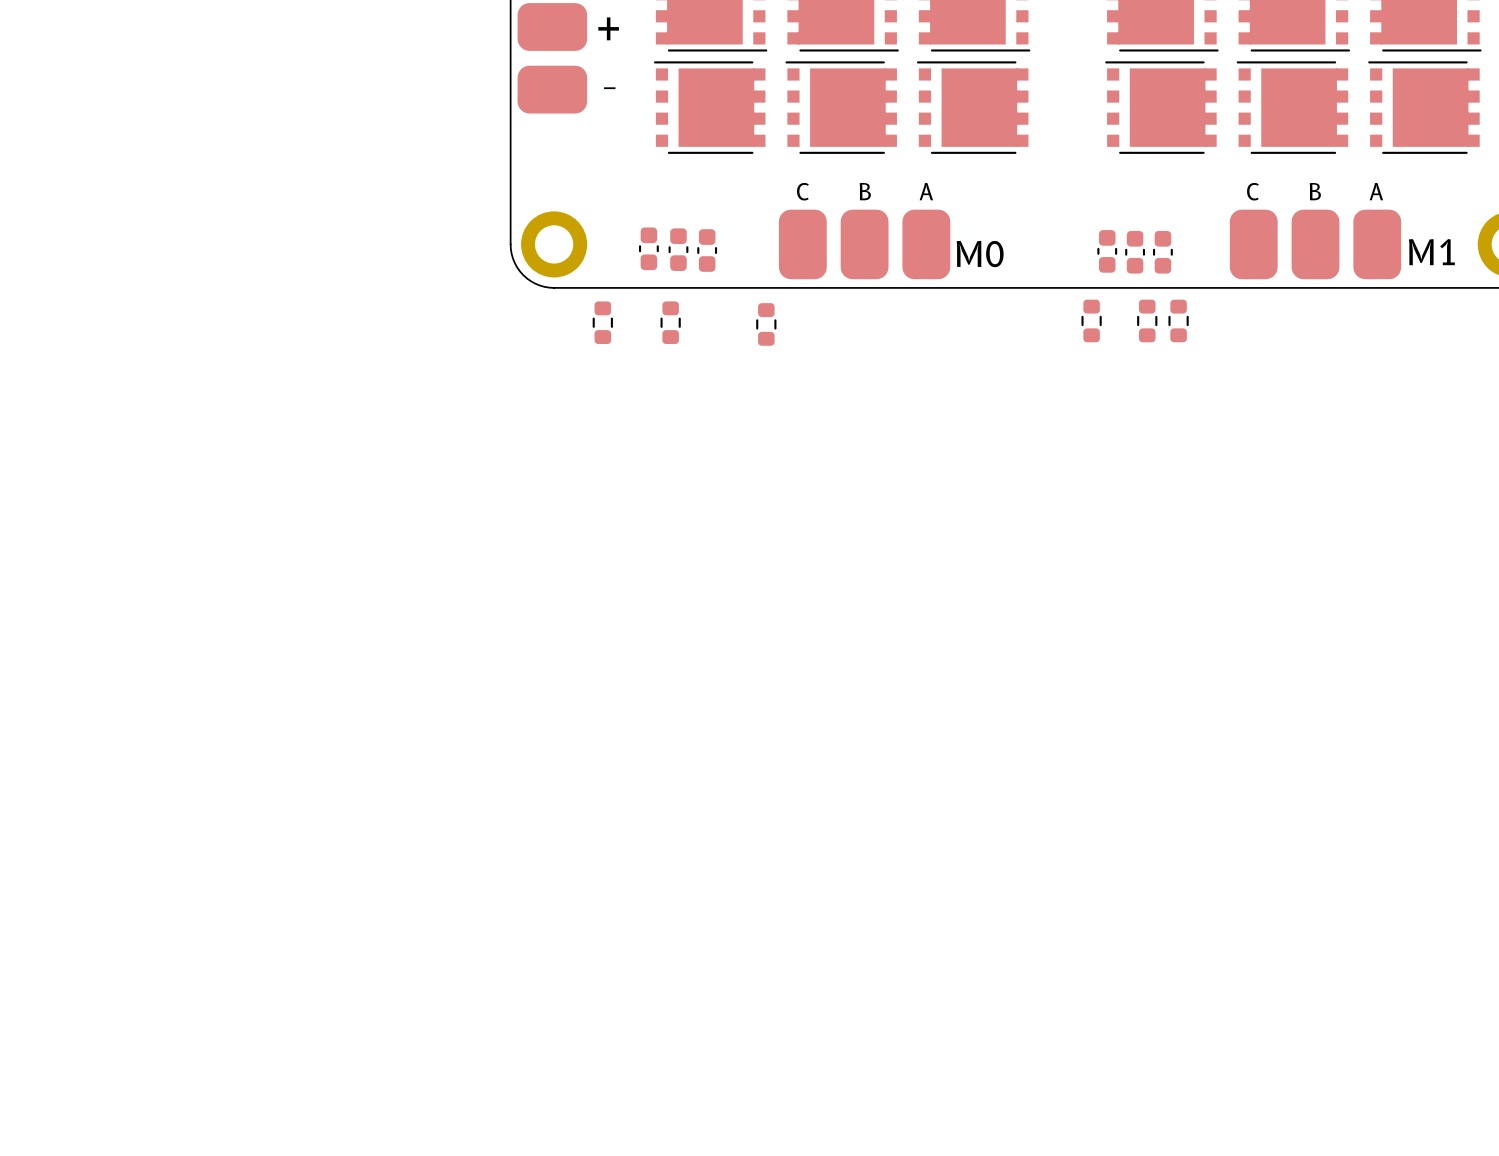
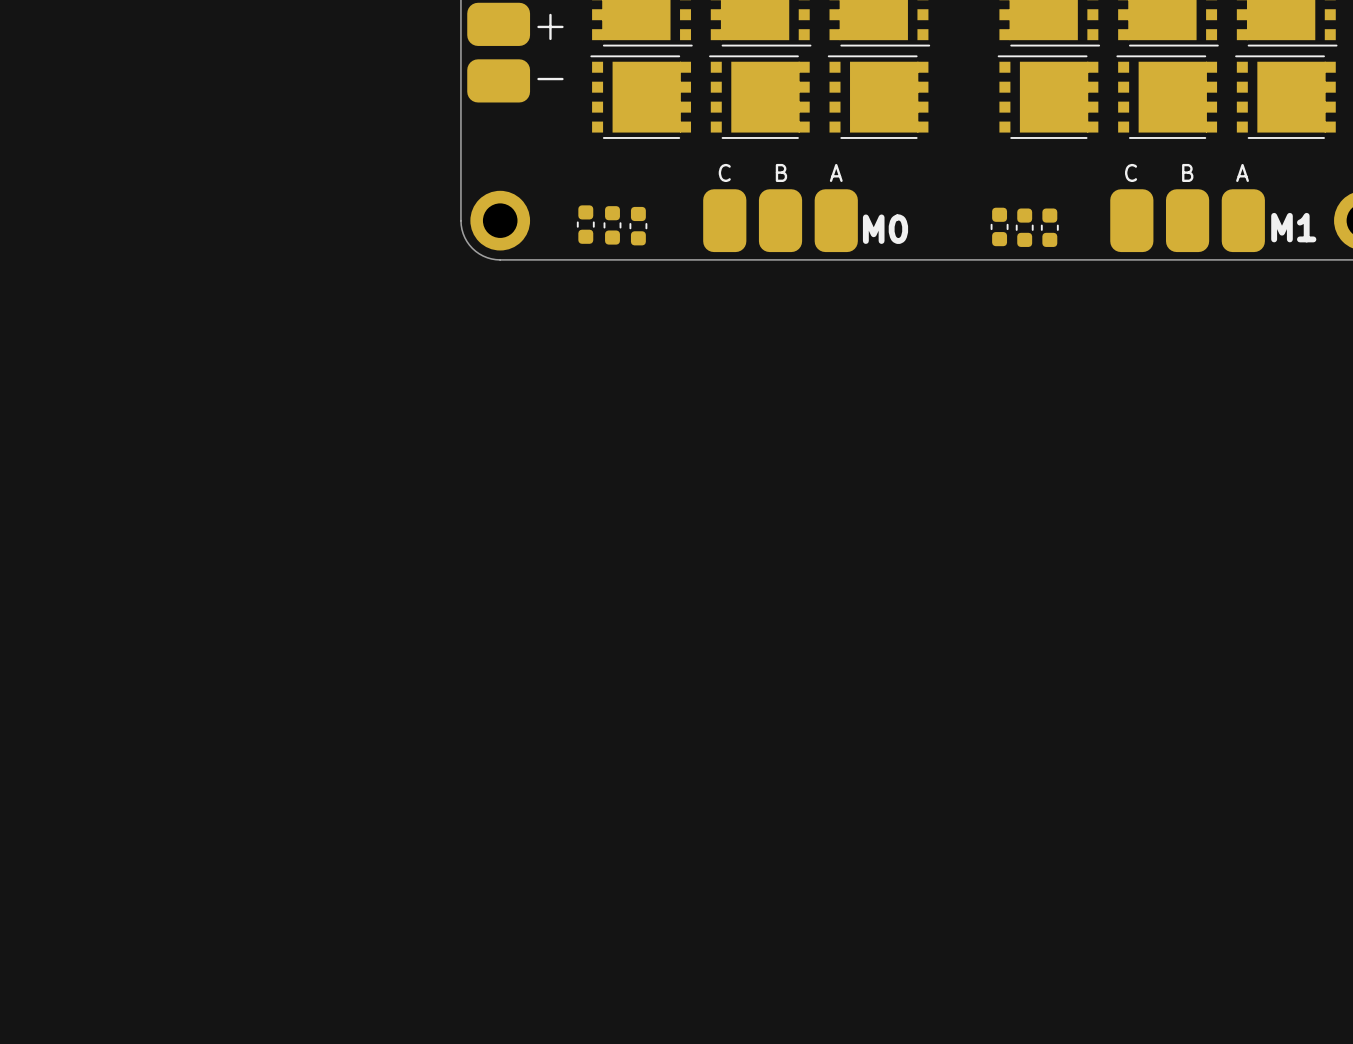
part: (1091, 320) -> none
part: (1147, 320) -> none
part: (1178, 320) -> none
part: (602, 322) -> none
part: (670, 322) -> none
part: (766, 324) -> none

